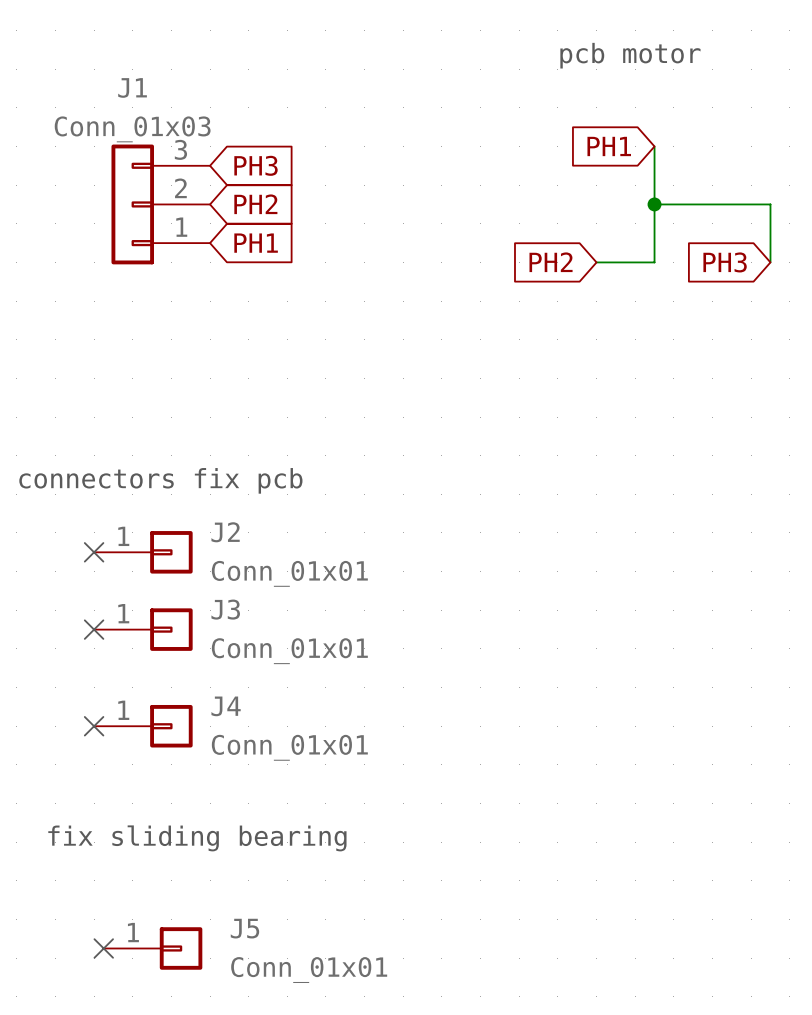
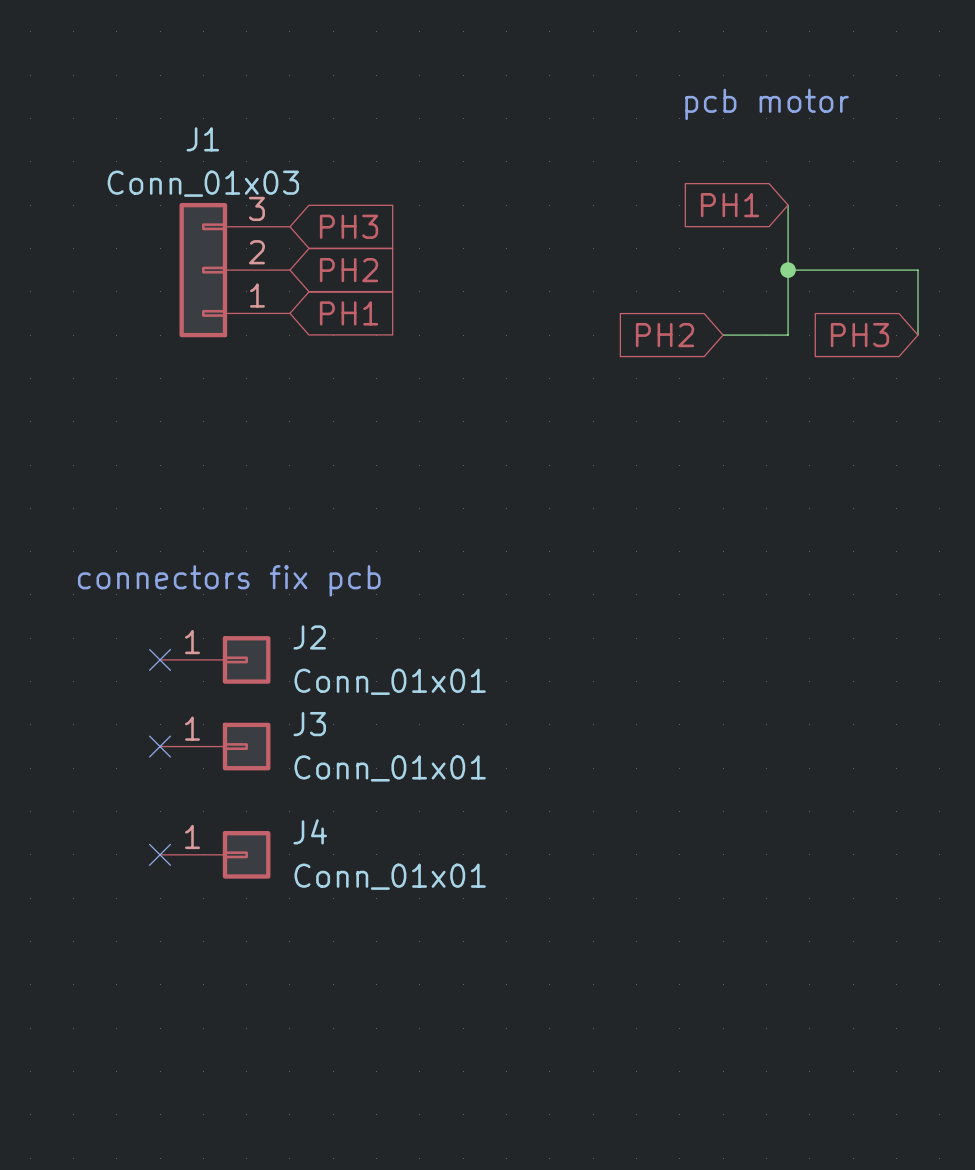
text: fix sliding bearing (197, 838) -> none
no-connect mark: (103, 948) -> none
J5: Conn_01x01 (153, 948) -> none

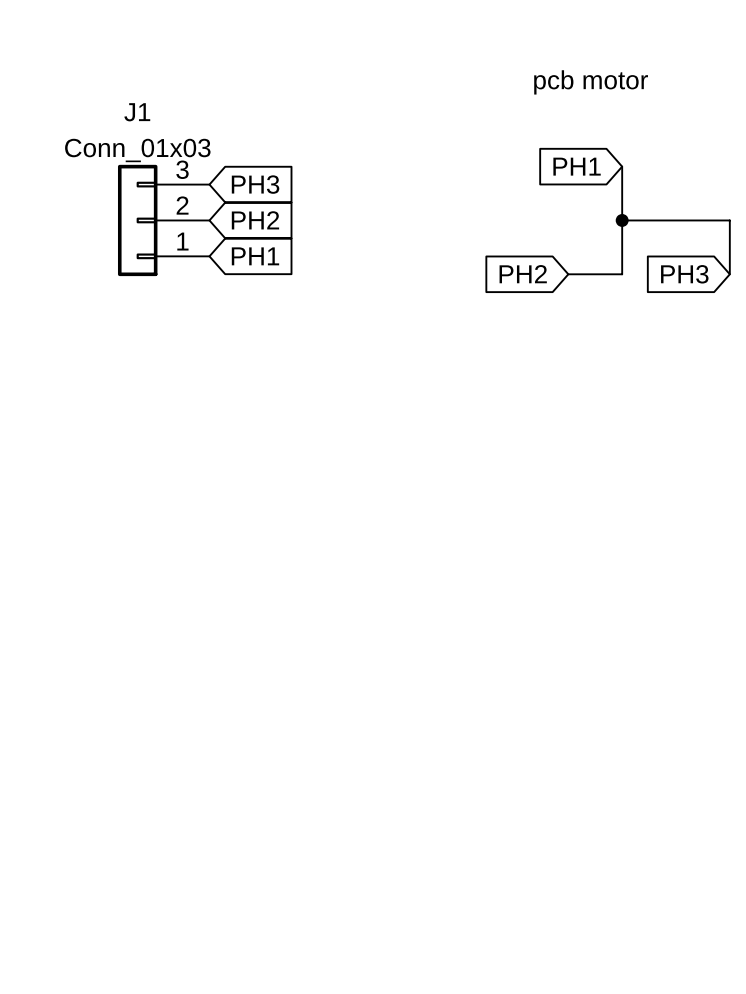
text: connectors fix pcb (229, 580) -> none
no-connect mark: (160, 659) -> none
J2: Conn_01x01 (215, 659) -> none
no-connect mark: (160, 746) -> none
J3: Conn_01x01 (215, 746) -> none
no-connect mark: (160, 854) -> none
J4: Conn_01x01 (215, 854) -> none

